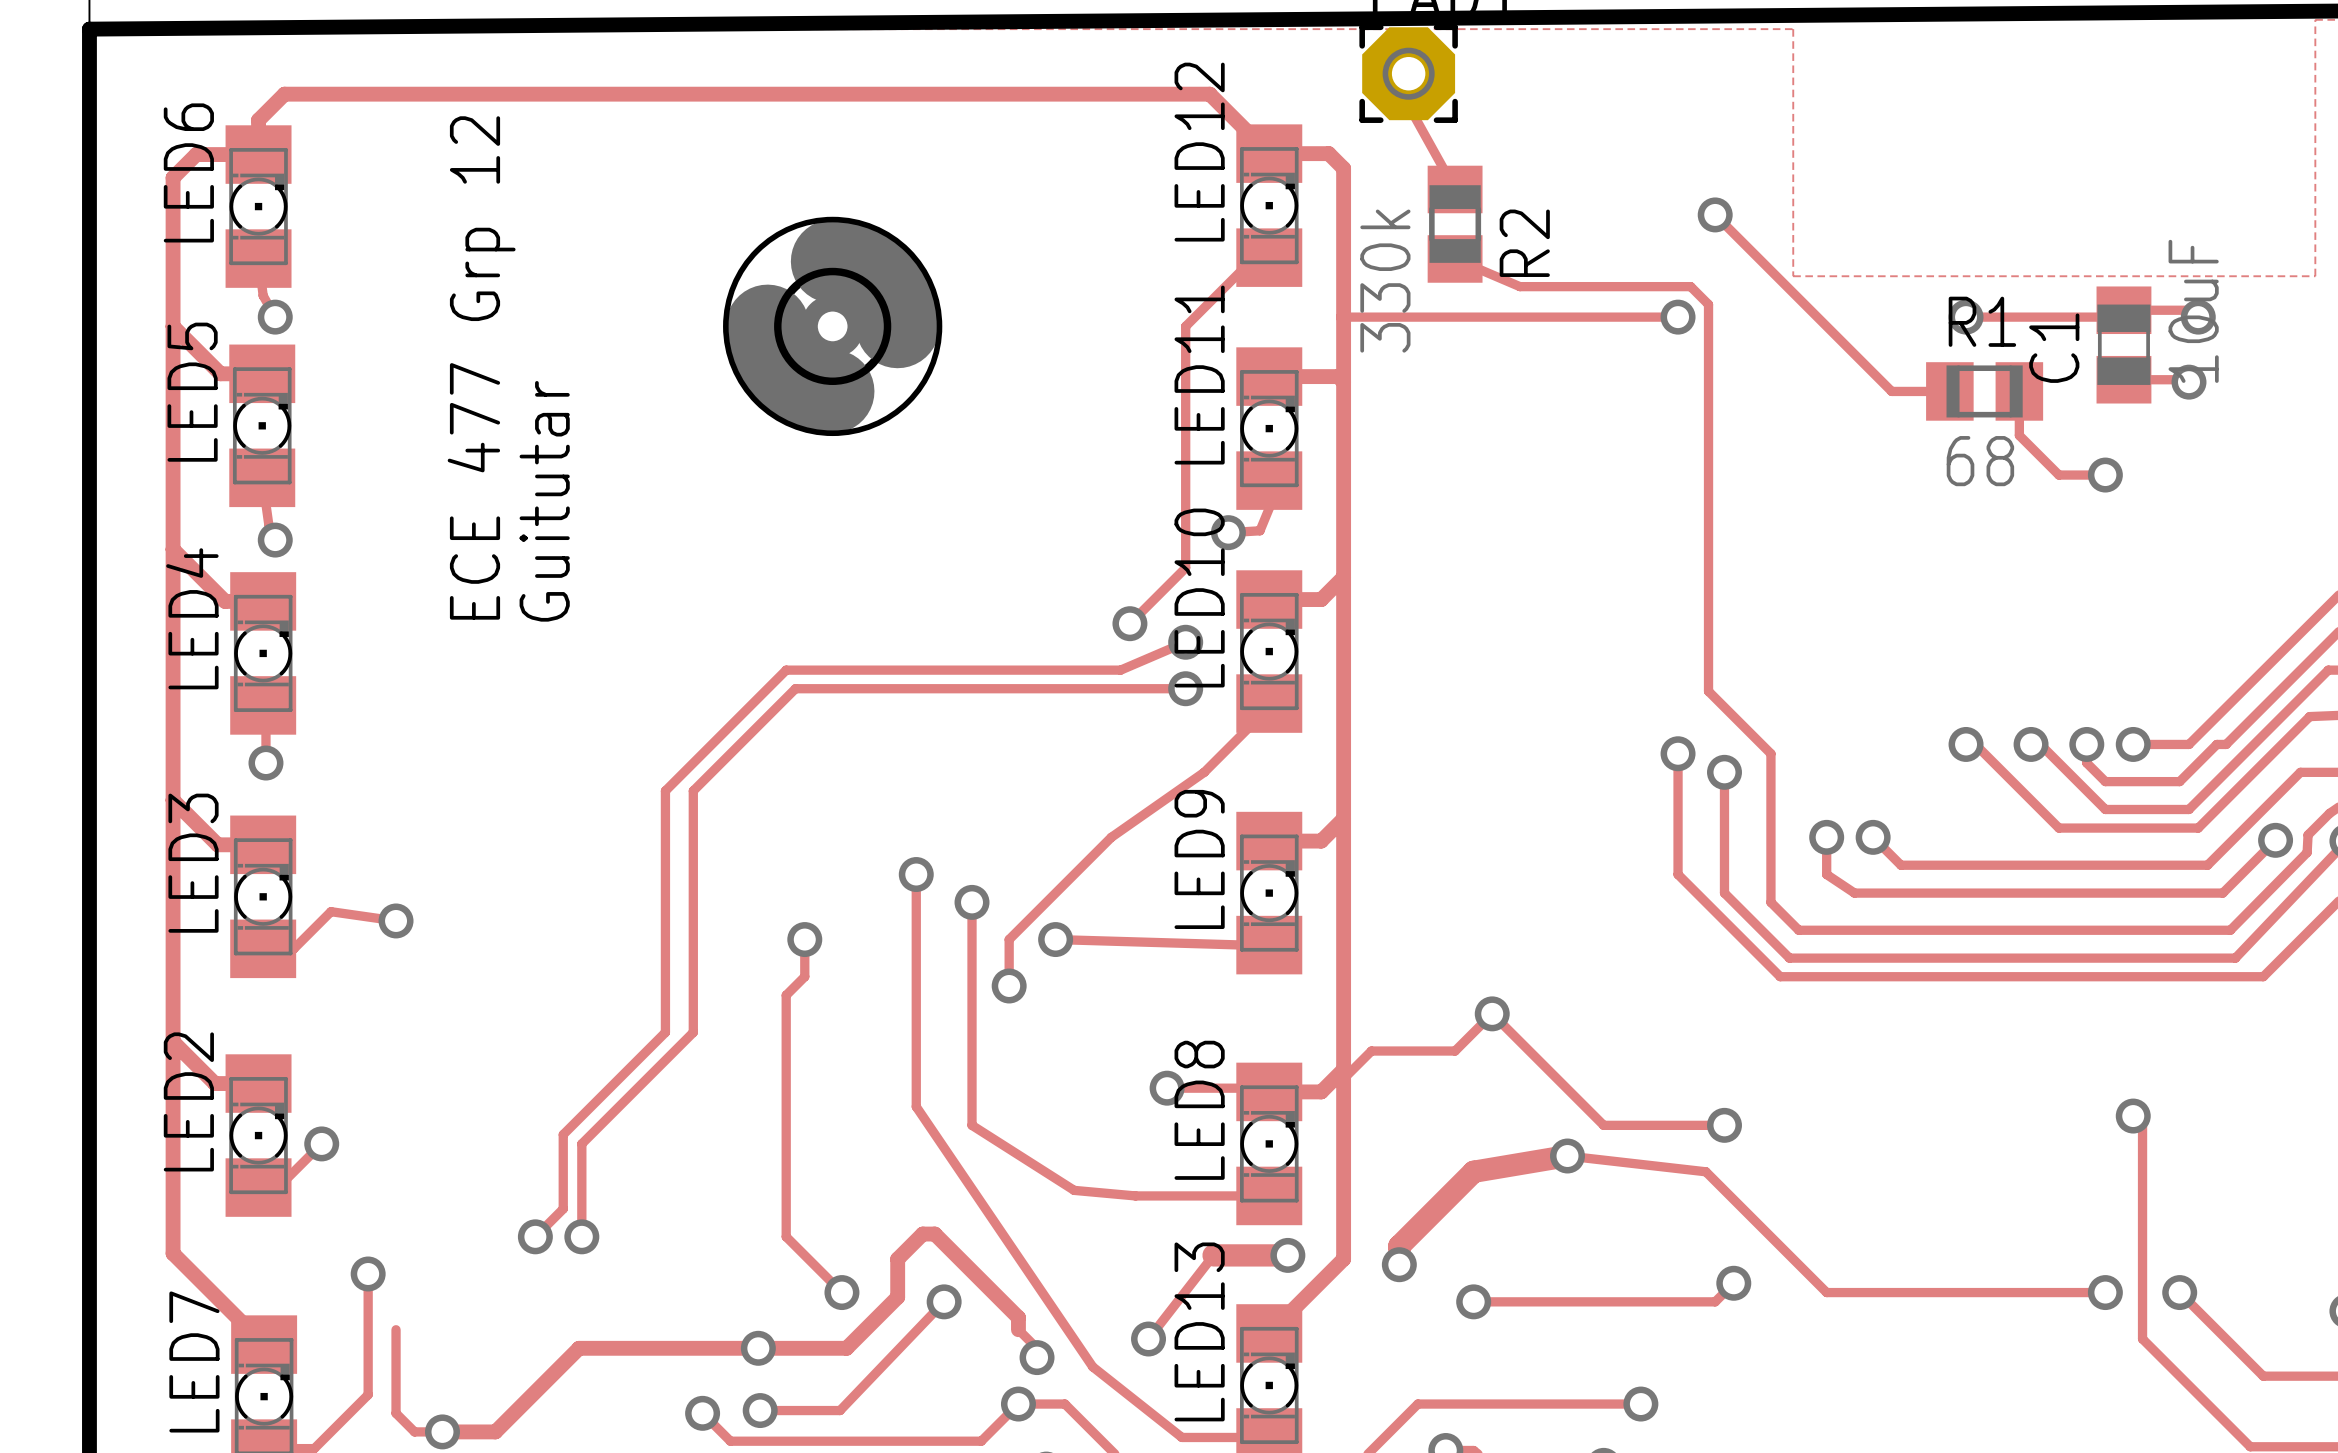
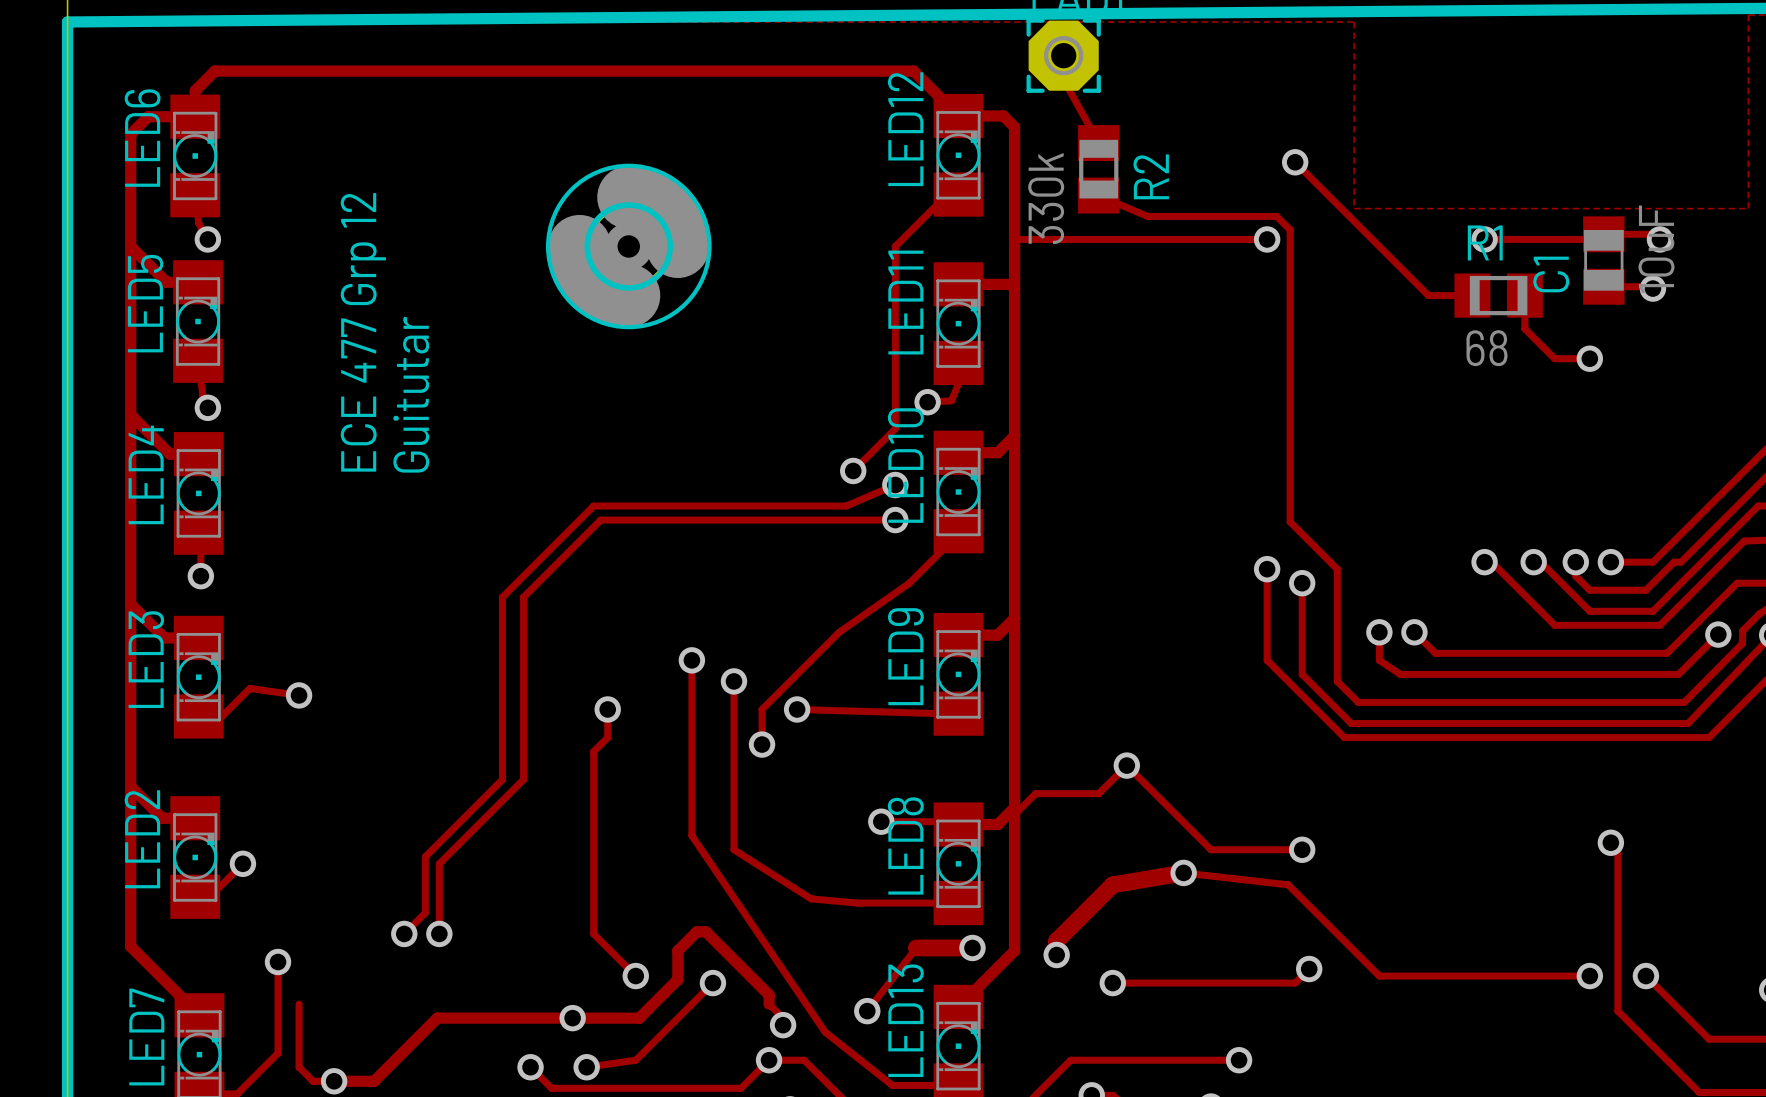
track: (944, 1301) (840, 1410) (760, 1410) -> (712, 983) (635, 1060) (586, 1067)
via position: (760, 1410) -> (586, 1067)

